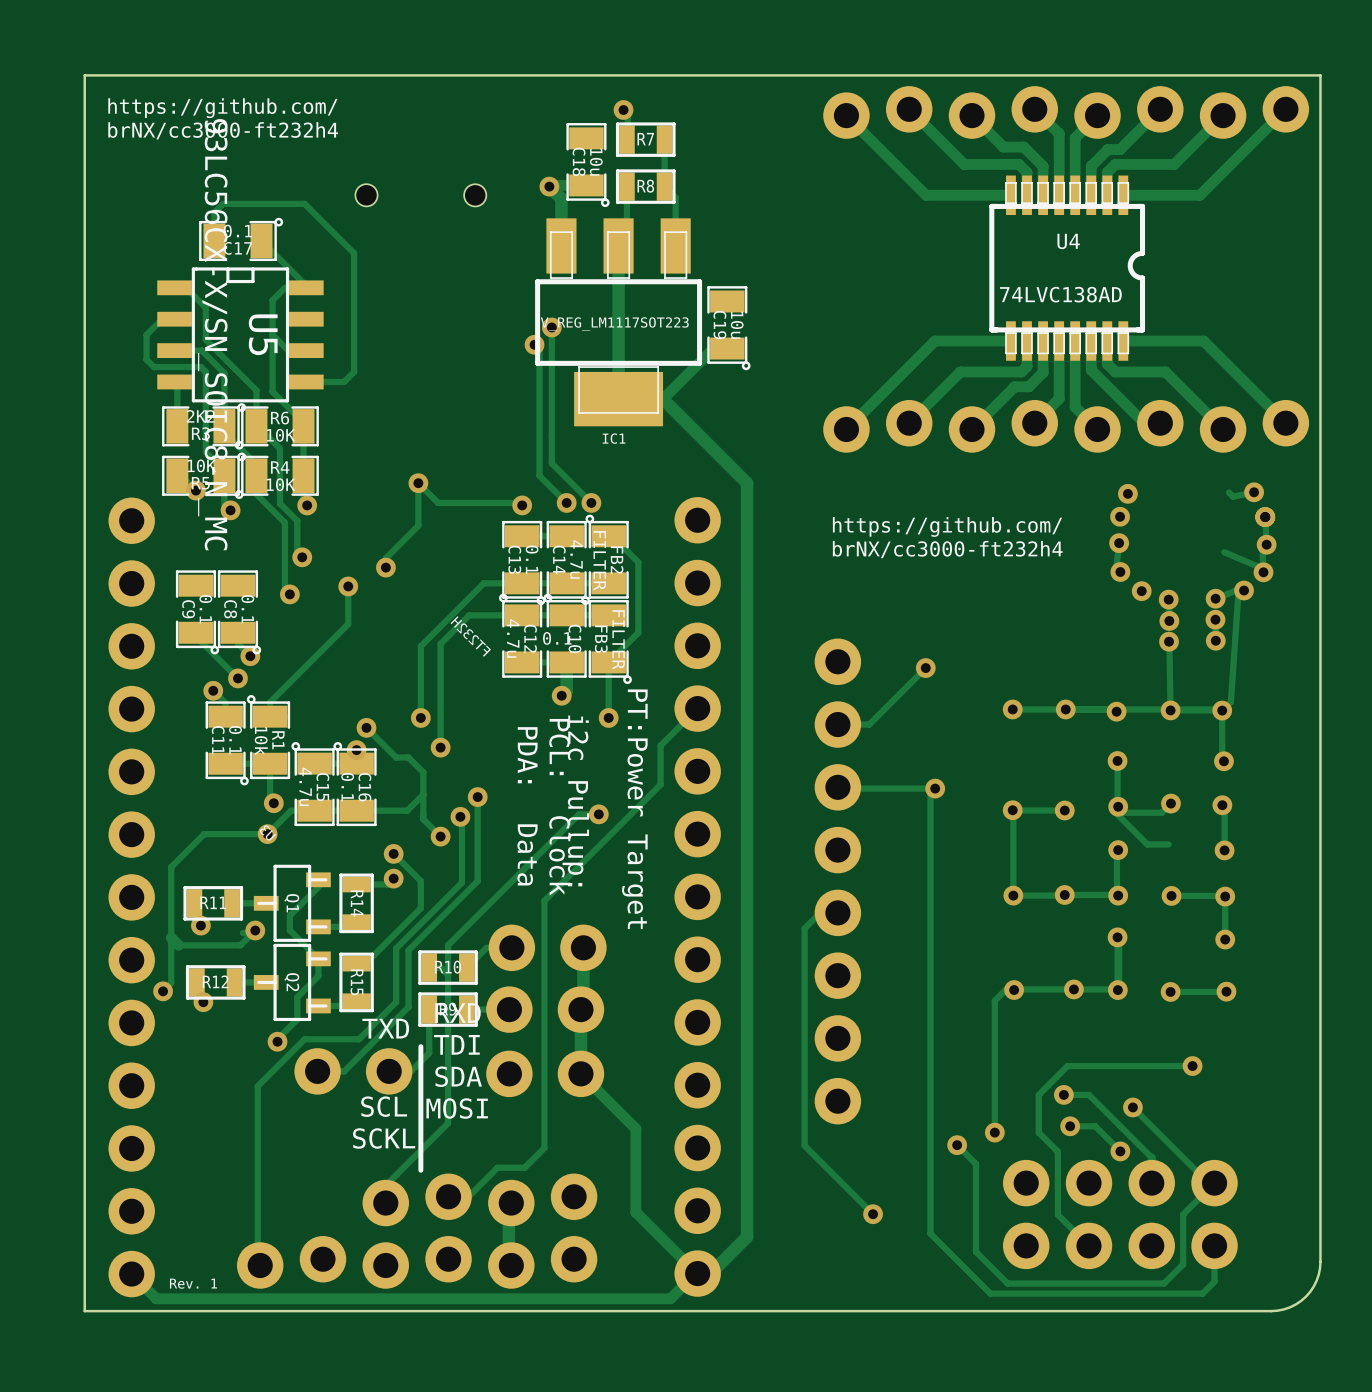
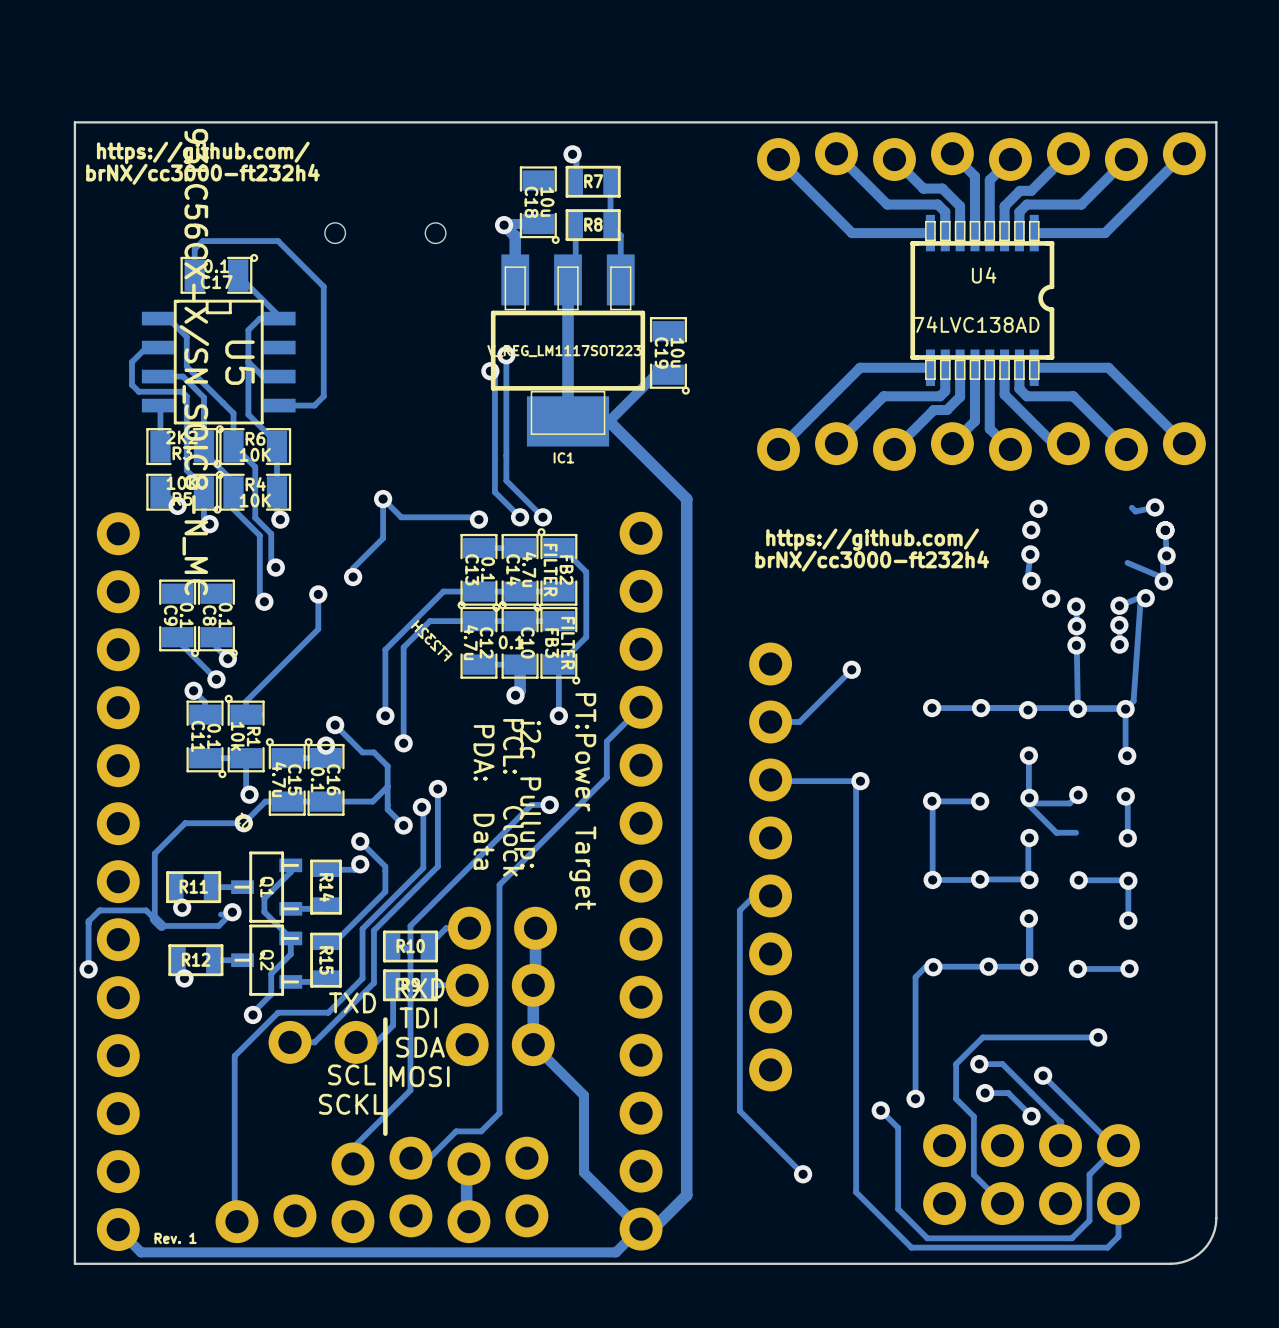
track: (171, 937) (171, 983) (163, 991) -> (154, 919) (146, 910) (99, 910) (88, 921) (88, 969)
via position: (163, 991) -> (88, 969)

